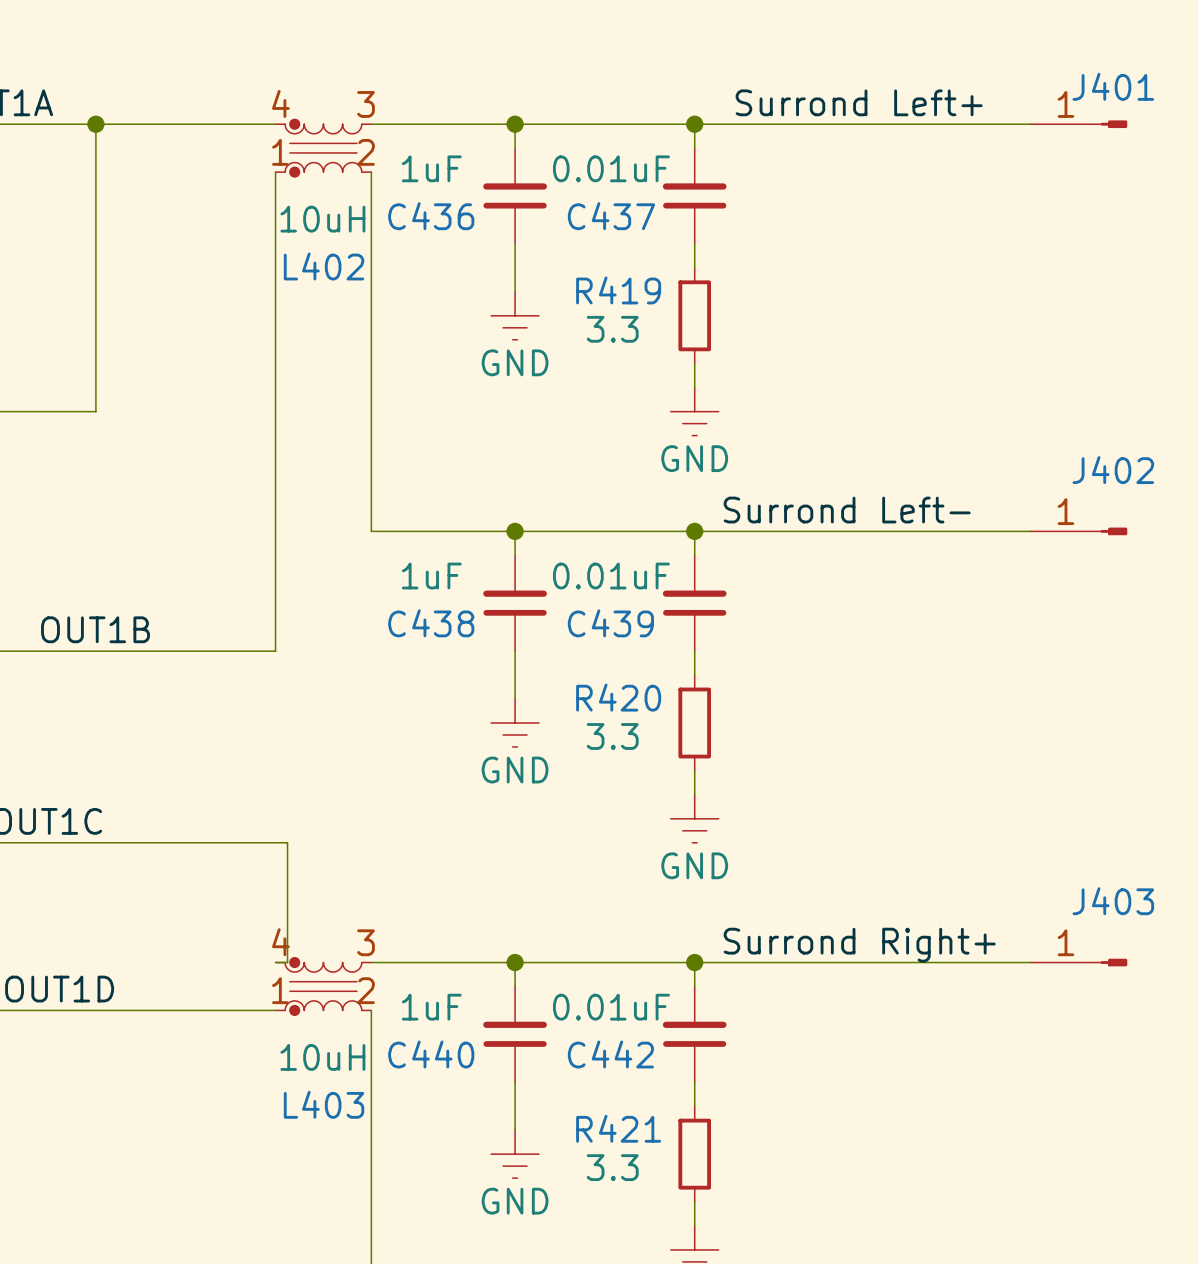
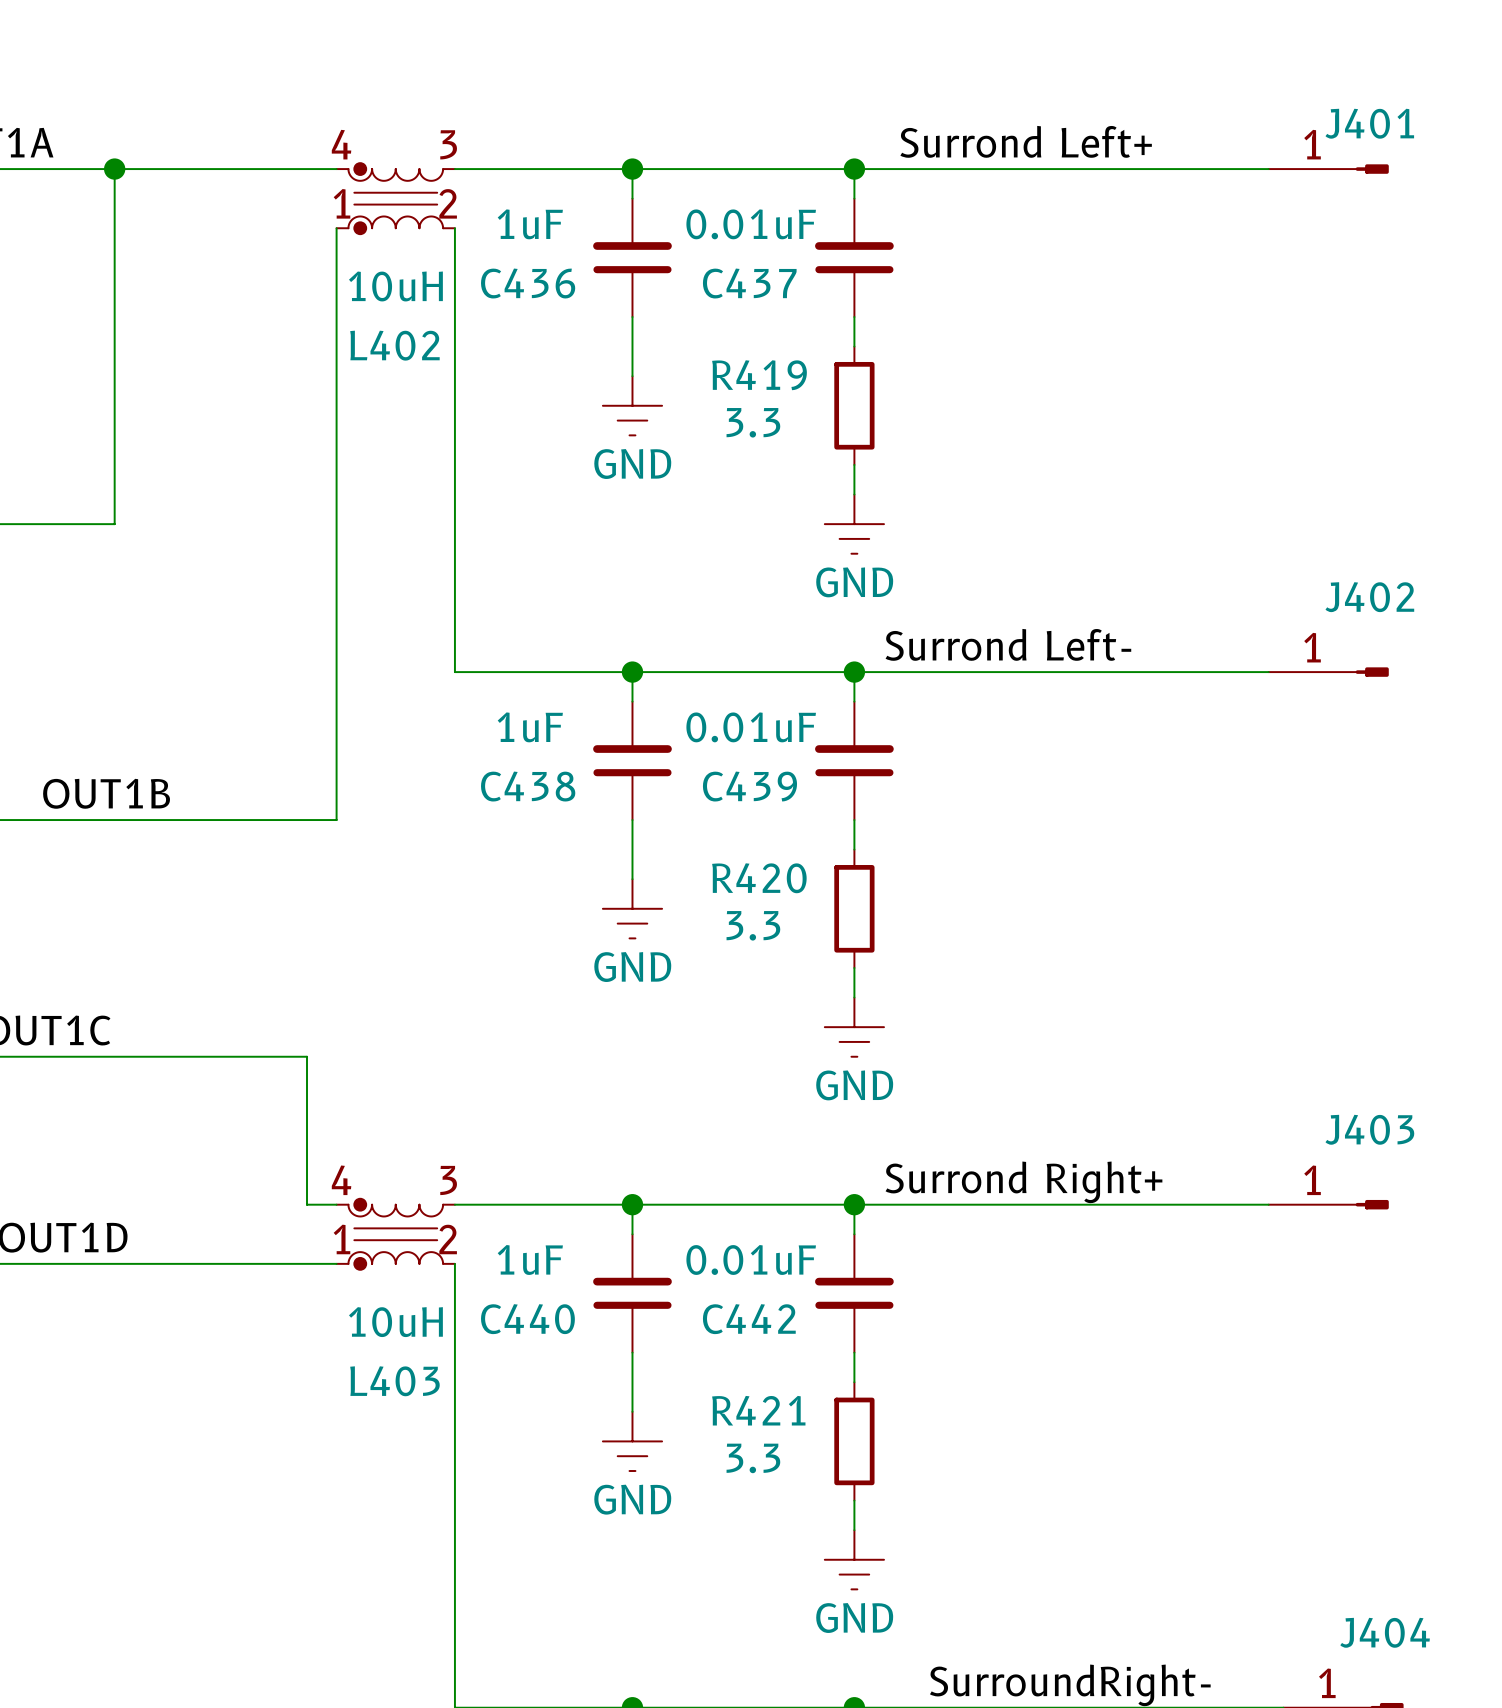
wire: (251, 842) (287, 842) (287, 962) (275, 962) -> (307, 1056) (307, 1204) (336, 1204)

